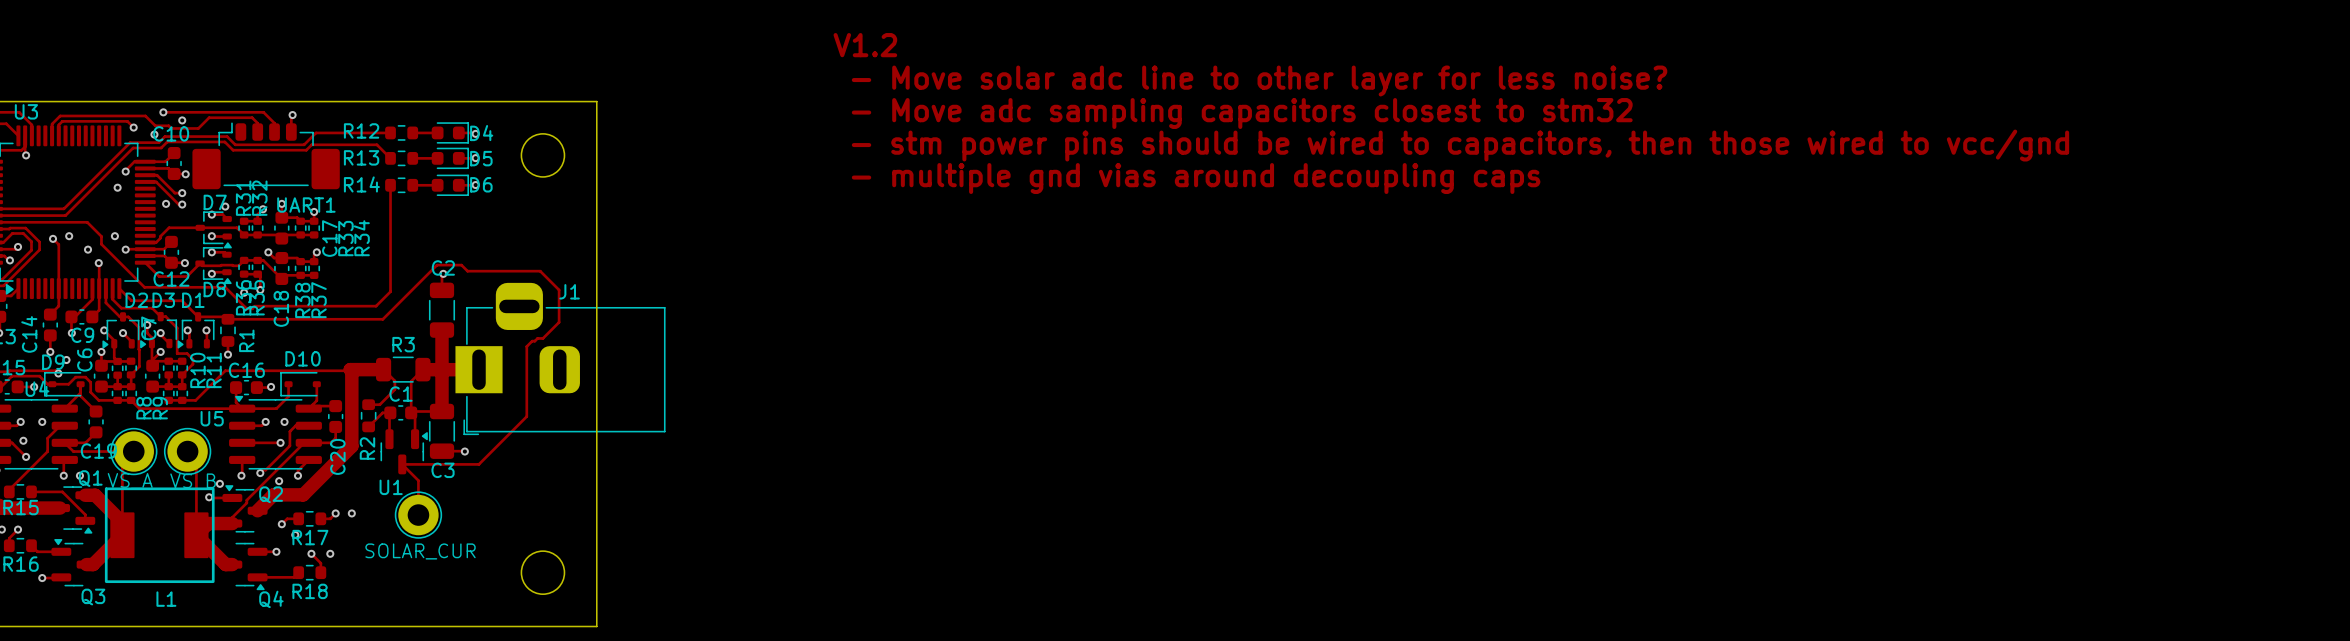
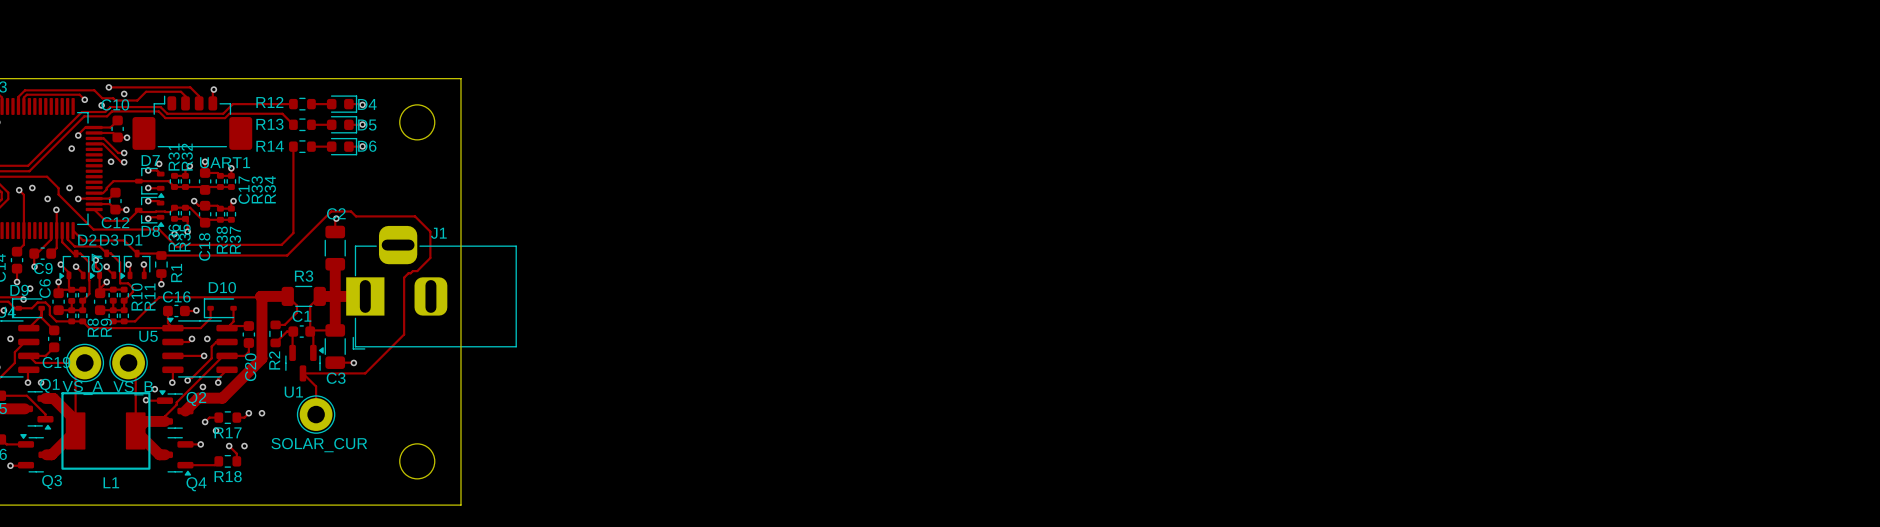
text: V1.2 (865, 45) -> none
text: - Move solar adc line to other layer for less noise? (1259, 81) -> none
text: - Move adc sampling capacitors closest to stm32 (1242, 113) -> none
text: - stm power pins should be wired to capacitors, then those wired to vcc/gnd (1460, 145) -> none
text: - multiple gnd vias around decoupling caps (1196, 178) -> none

